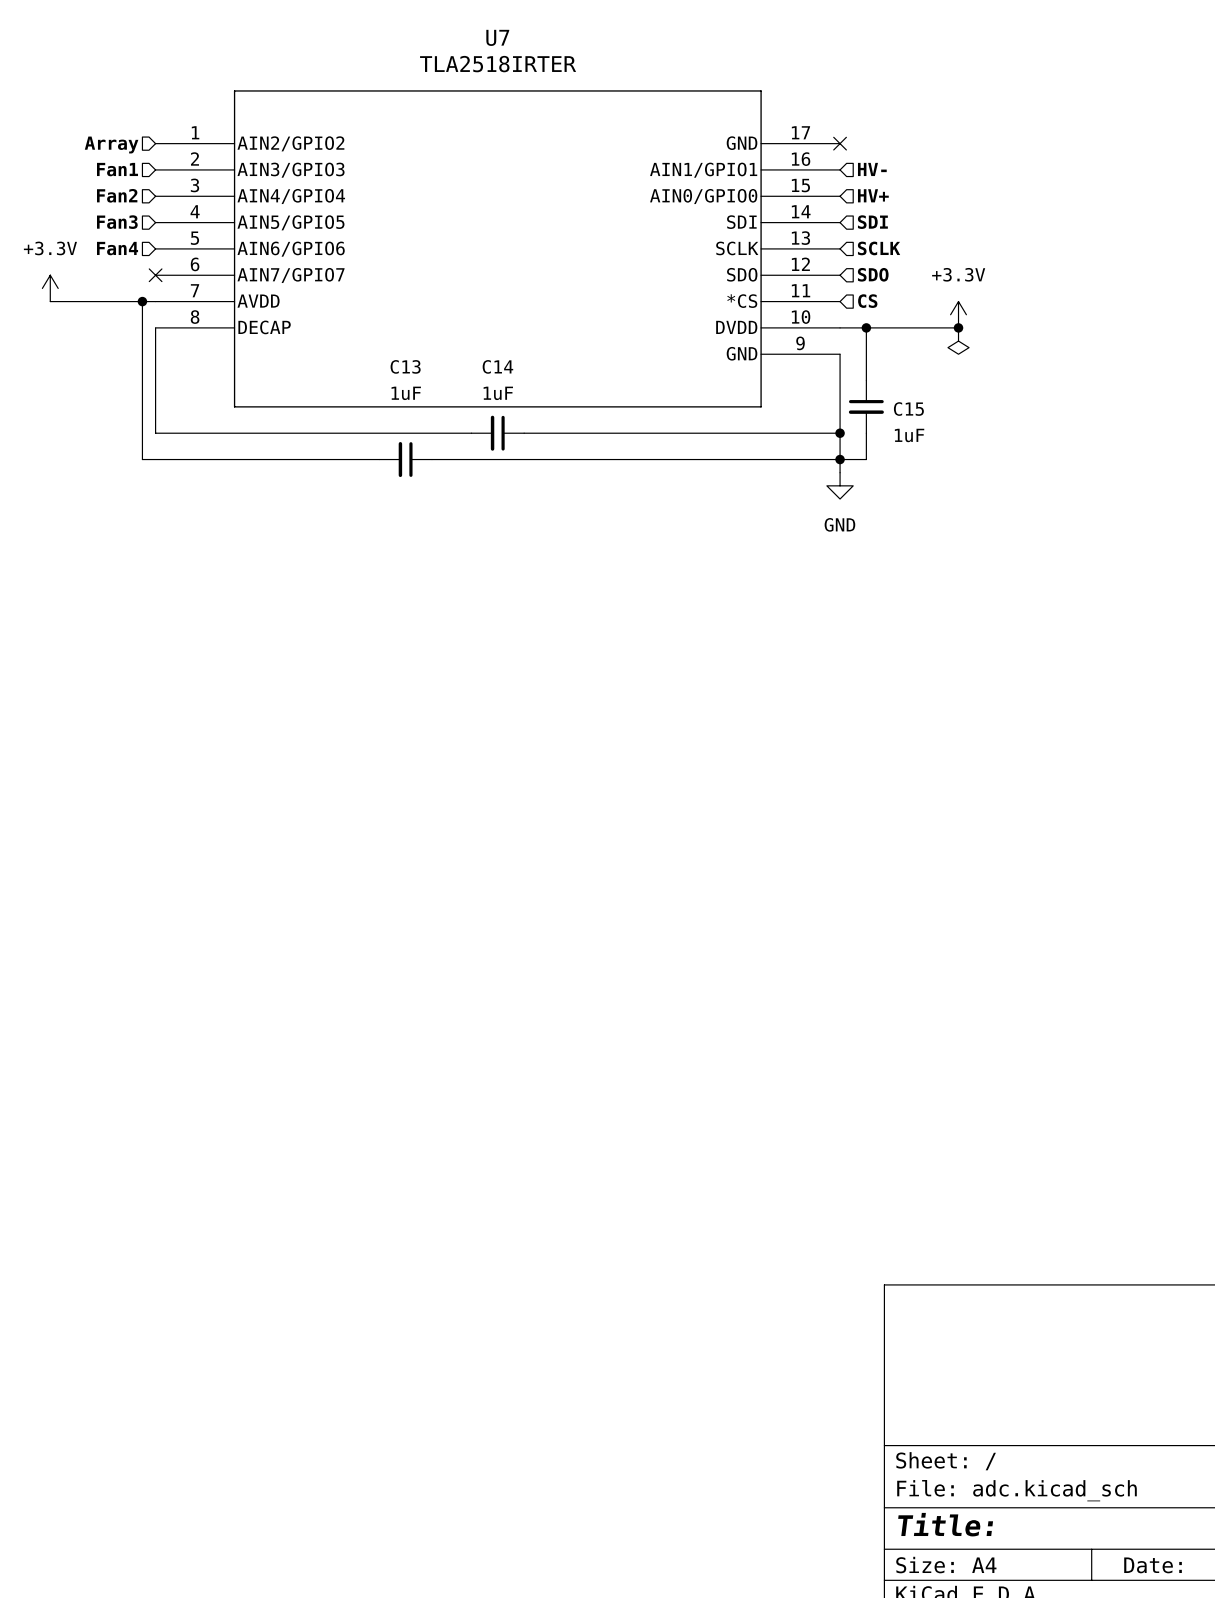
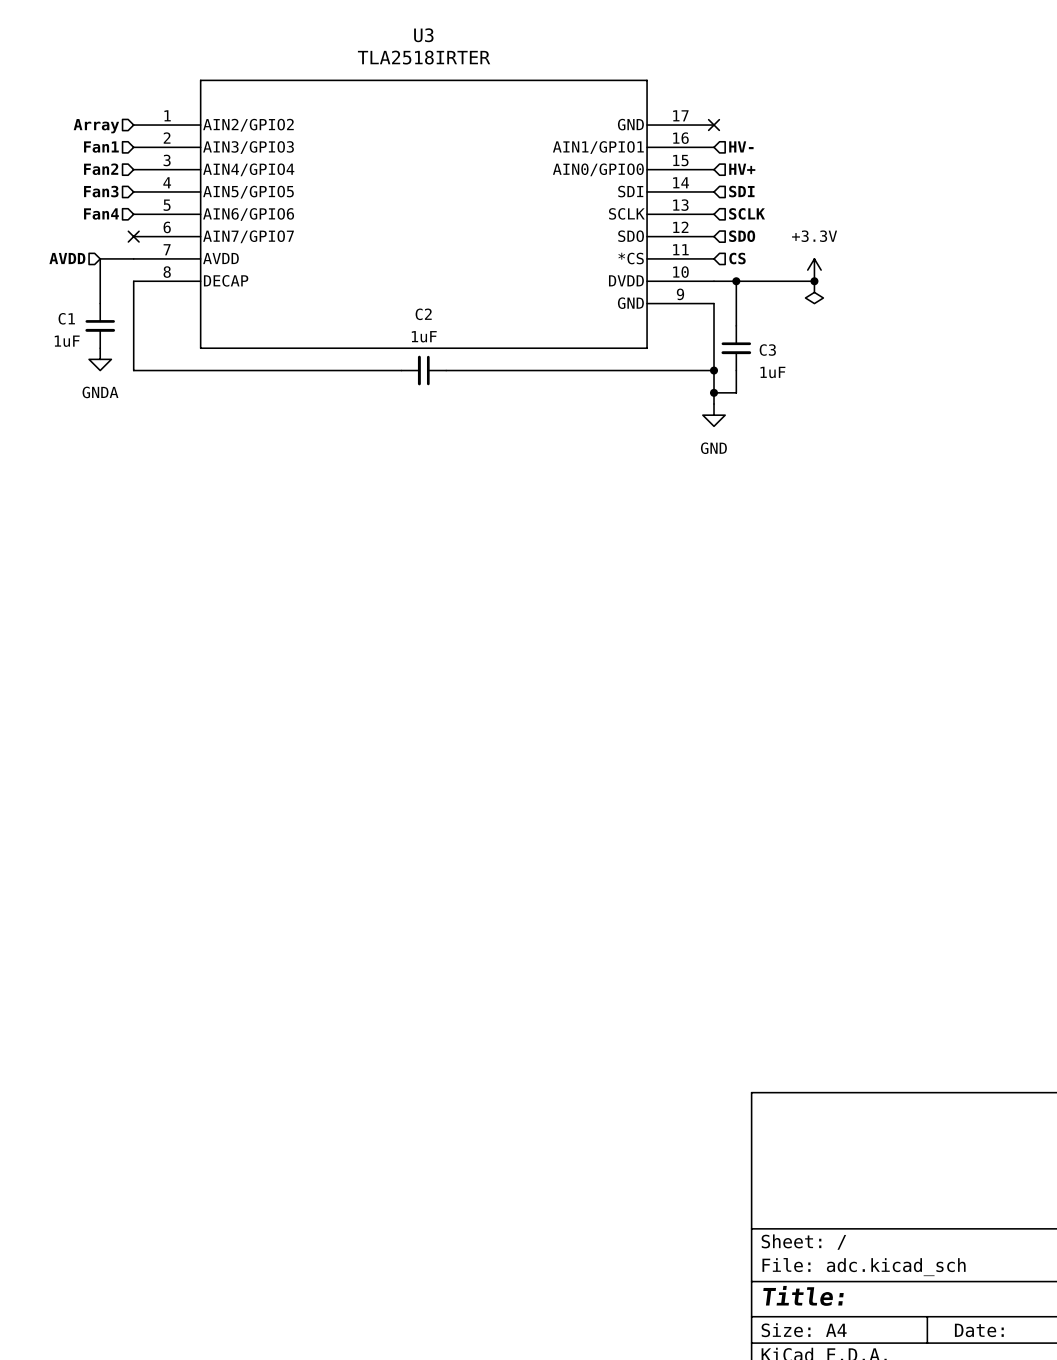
U7 name: U7 (497, 37) -> U3 (423, 35)
power symbol: +3.3V (50, 288) -> none
wire: (50, 301) (116, 301) -> (100, 303) (100, 258)
hierarchical label: none -> AVDD (67, 258)
wire: (142, 301) (142, 459) (379, 459) -> none
junction: (142, 301) -> none
C14 name: C14 (497, 366) -> C2 (423, 314)
C1: none -> 1uF (100, 325)
C15 name: C15 (908, 409) -> C3 (767, 350)
power symbol: none -> GNDA (100, 359)
C13: 1uF (405, 459) -> none
wire: (432, 459) (840, 459) -> none

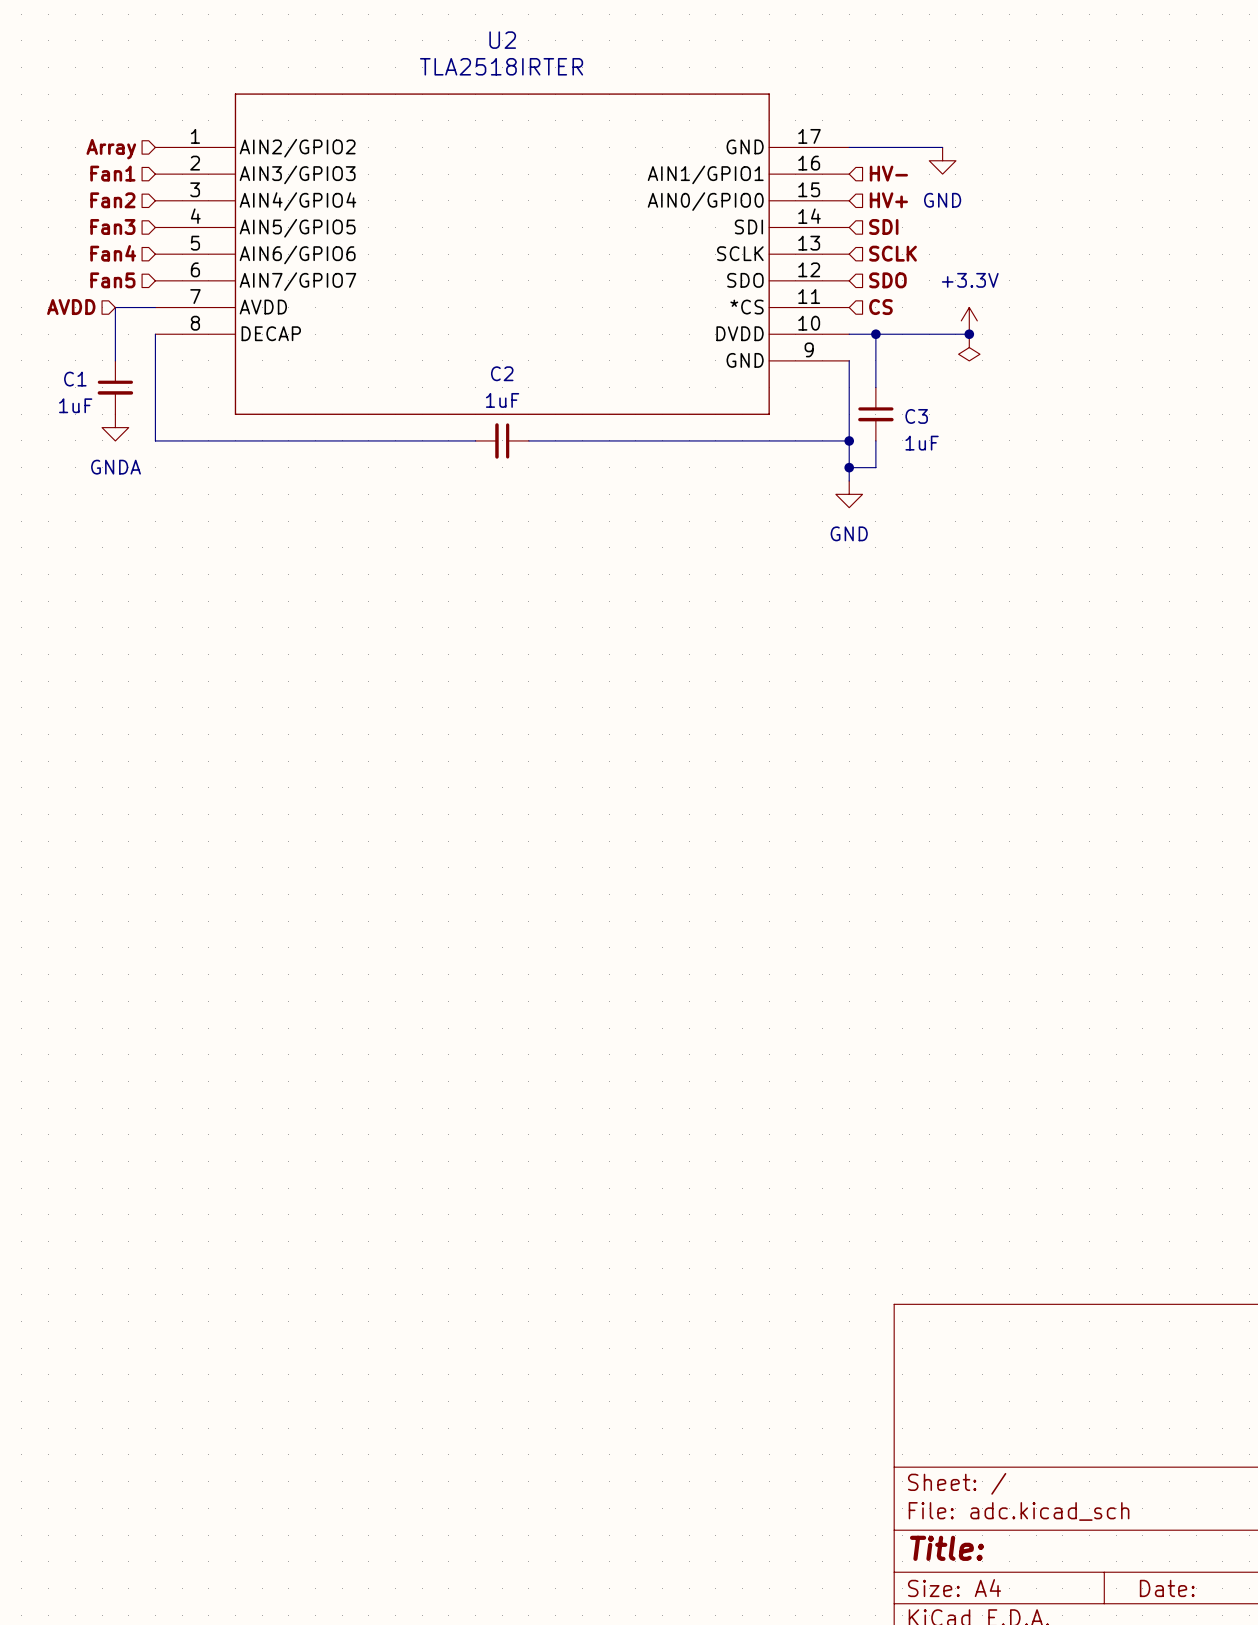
U3 name: U3 (423, 35) -> U2 (502, 40)
wire: none -> (849, 147) (942, 147)
no-connect mark: (714, 125) -> none
power symbol: none -> GND (942, 160)
hierarchical label: none -> Fan5 (112, 280)
no-connect mark: (133, 236) -> none

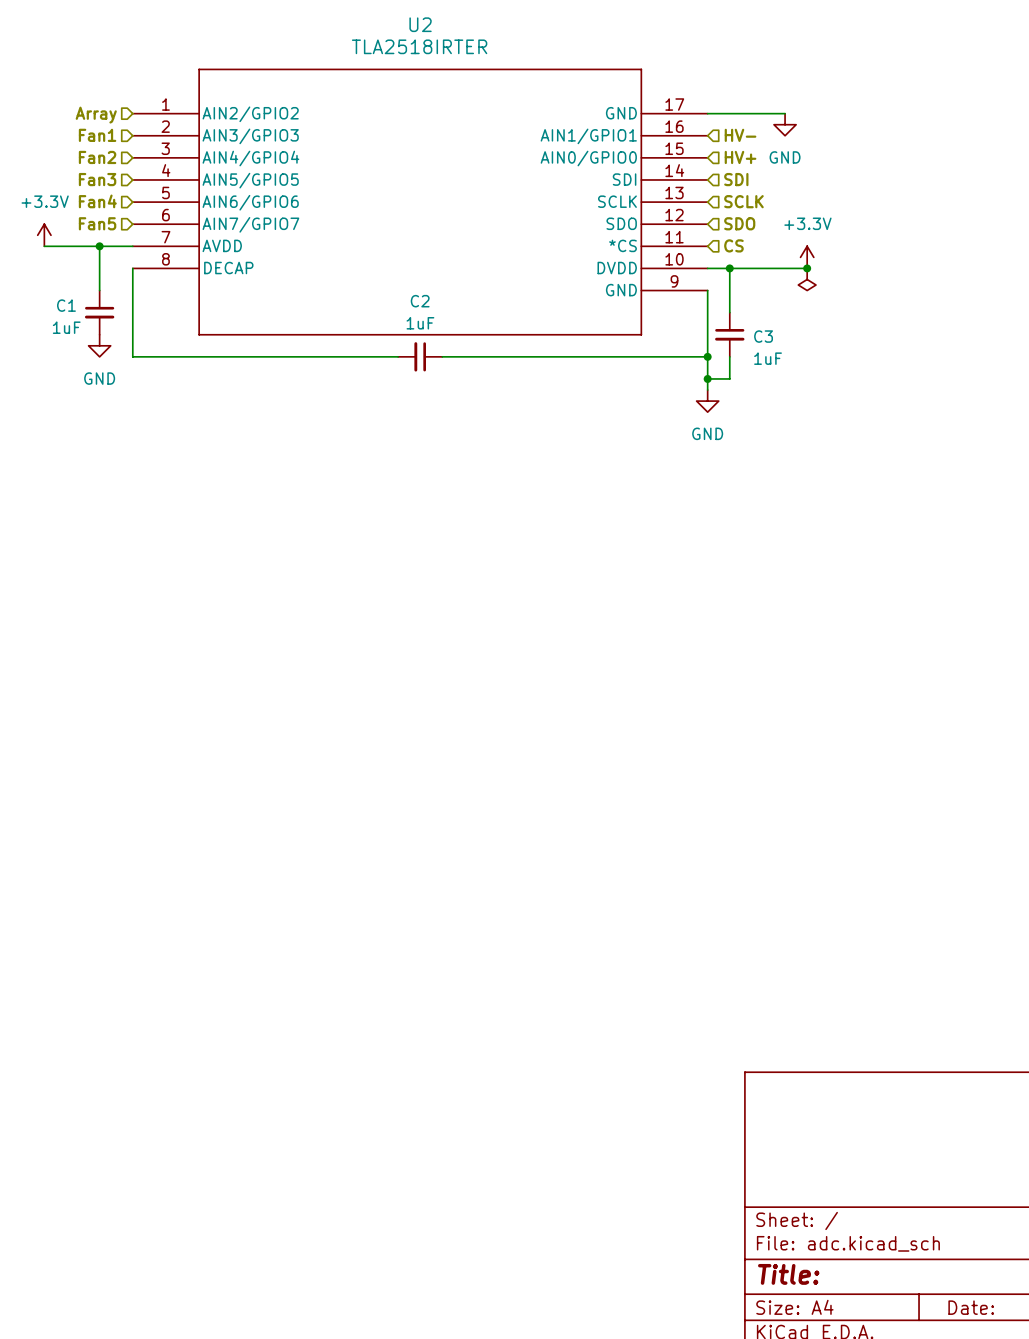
power symbol: none -> +3.3V (44, 235)
wire: none -> (44, 246) (99, 246)
hierarchical label: AVDD (71, 307) -> none
junction: none -> (99, 246)
power symbol: GNDA (115, 427) -> GND (99, 345)

